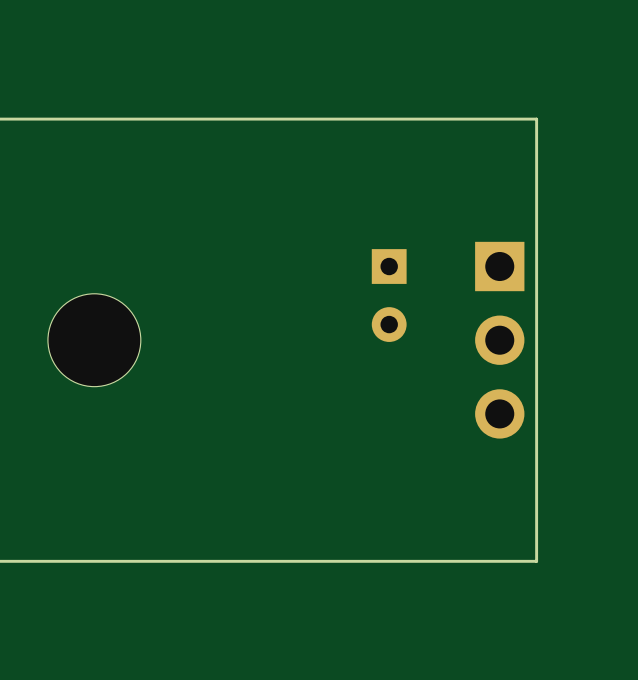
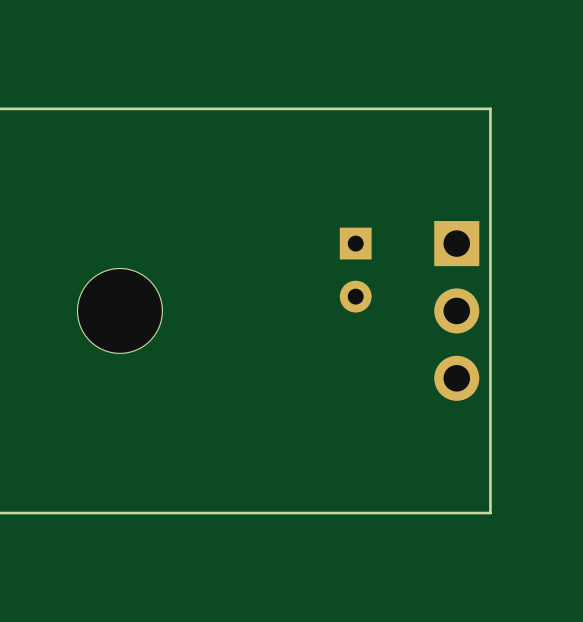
part position: (94, 340) -> (119, 310)

